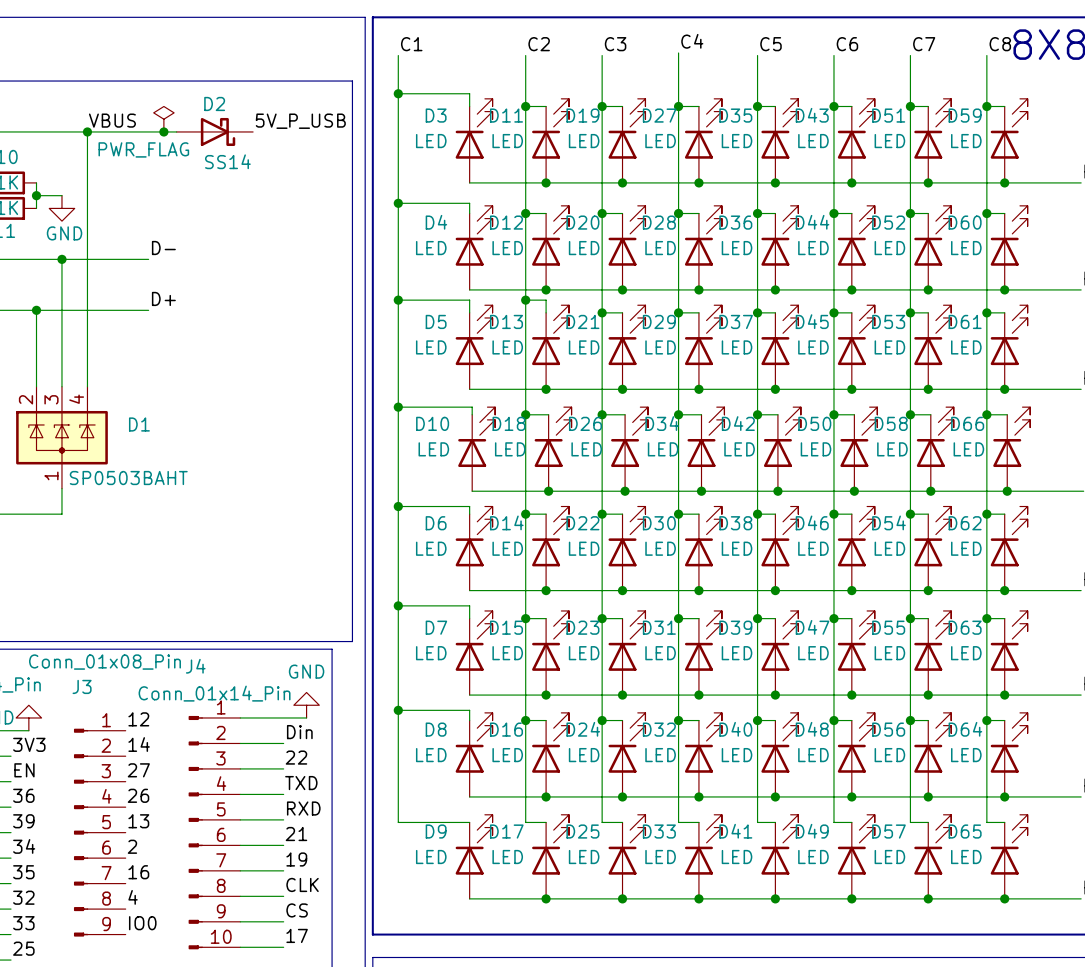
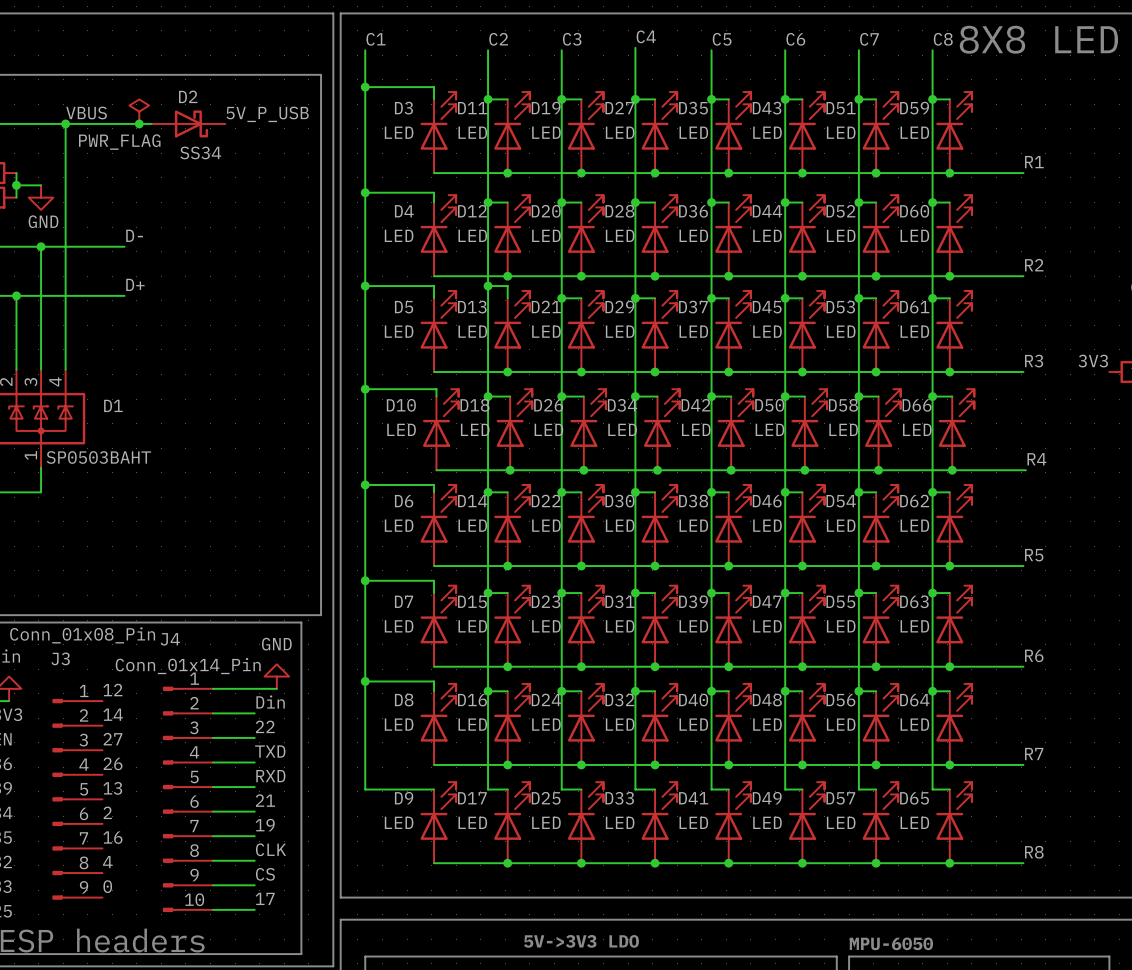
D2 value: SS14 (227, 161) -> SS34 (200, 152)
label: IO0 (142, 923) -> 0 (107, 886)

